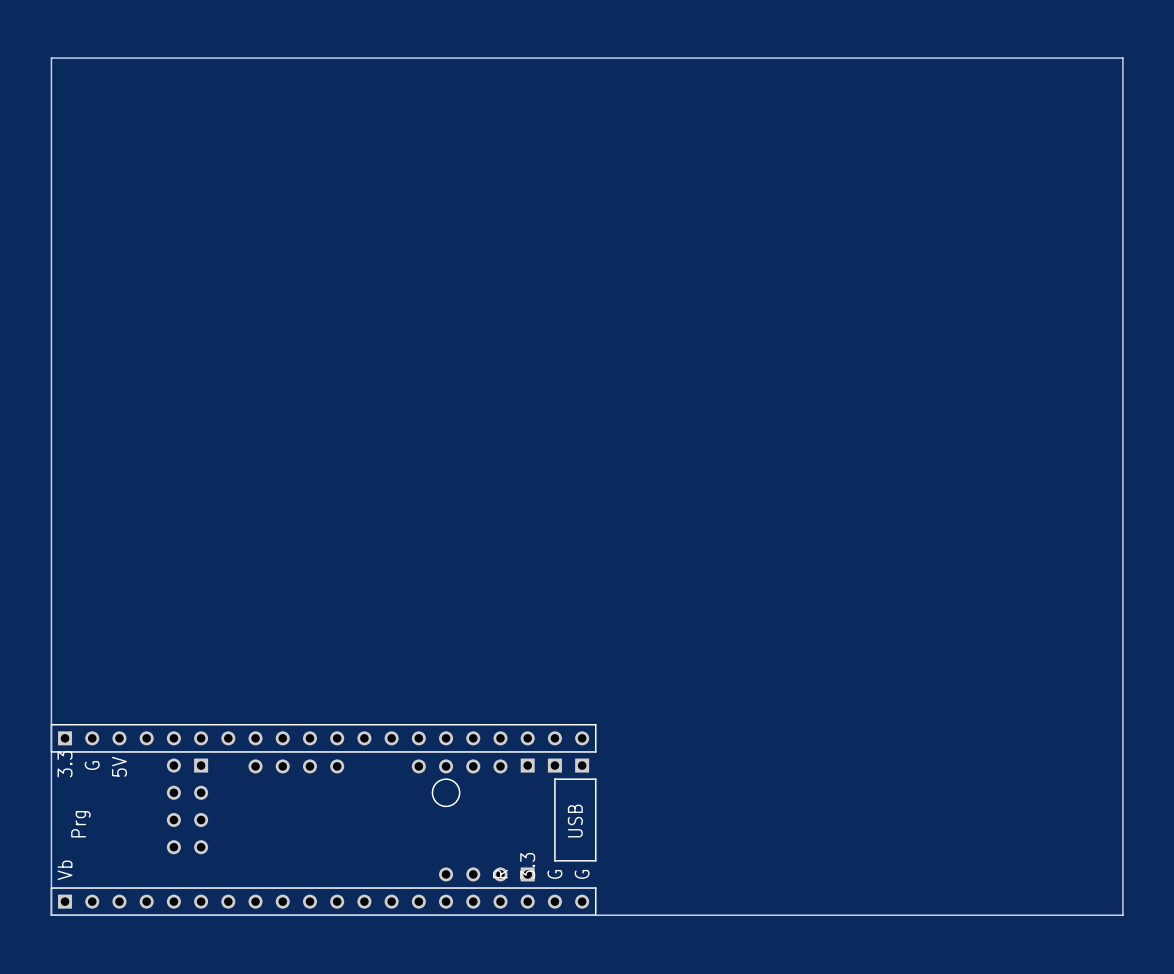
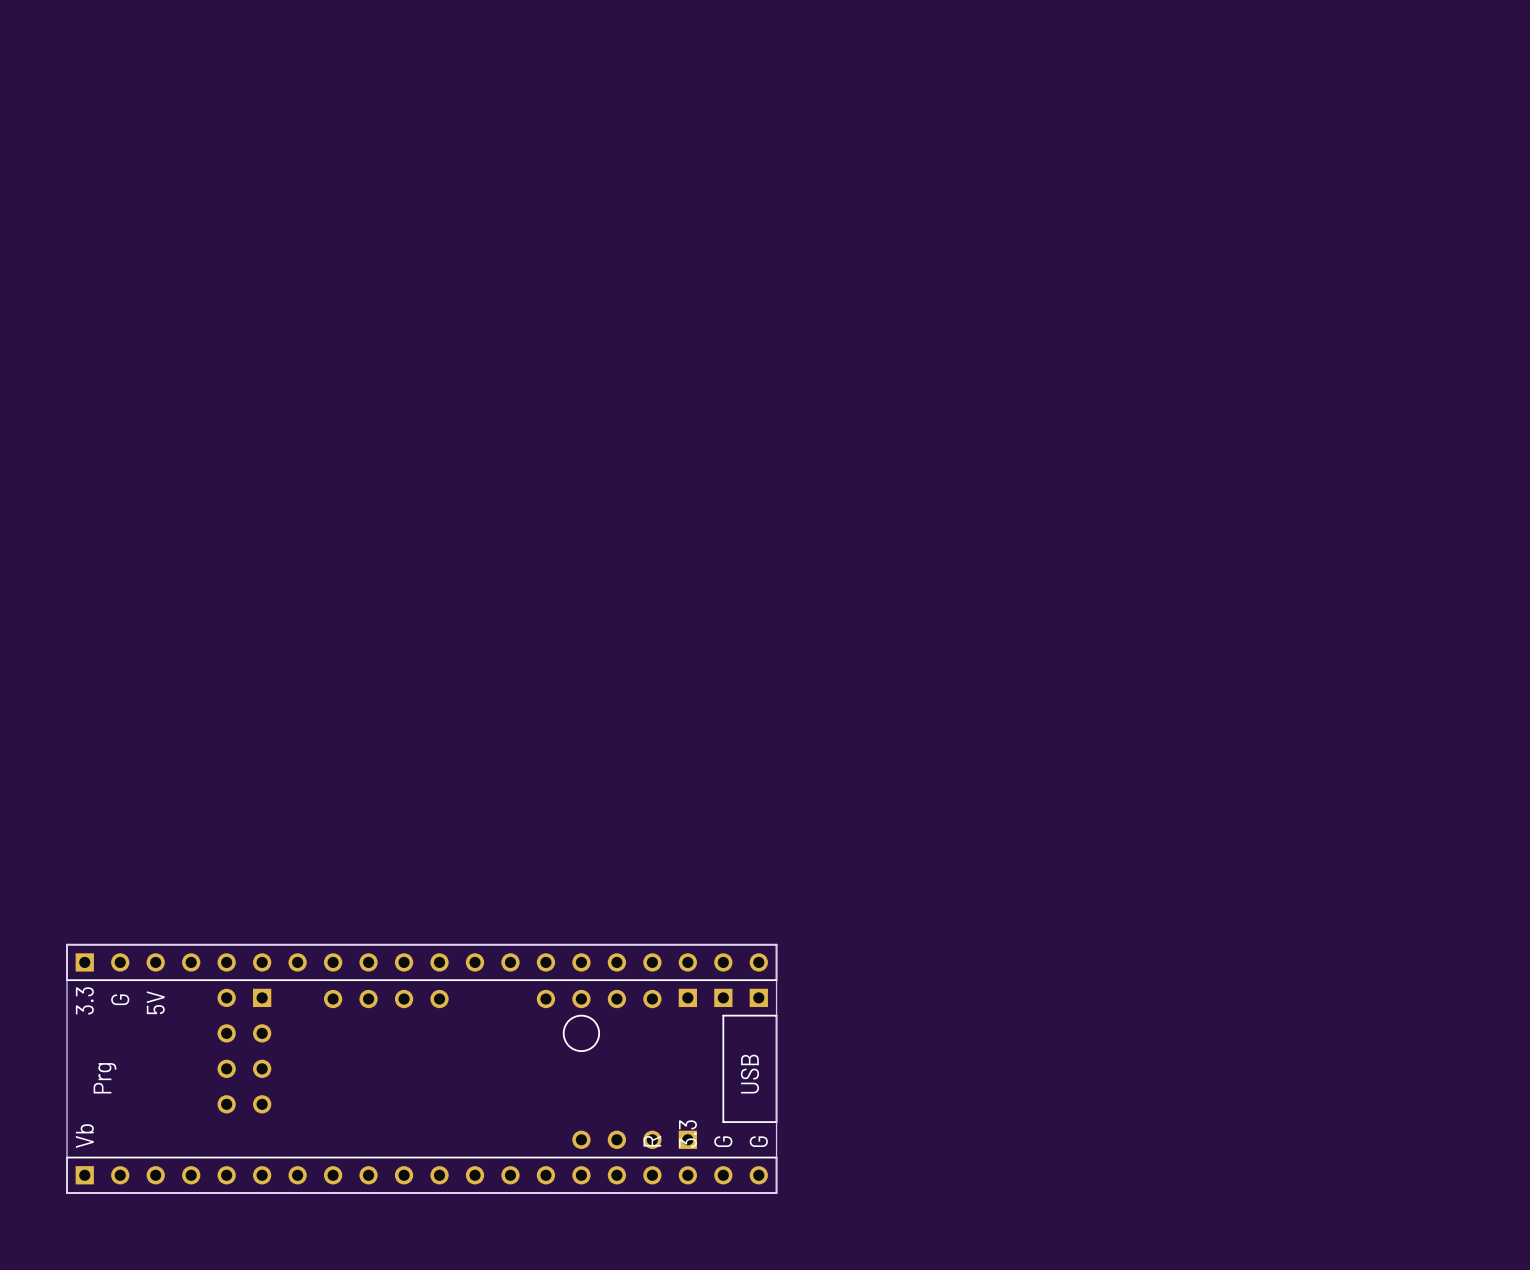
board edge: (51, 724) (51, 58) (1122, 58) (1122, 915) (595, 915) -> (67, 944) (776, 944) (776, 1193)

